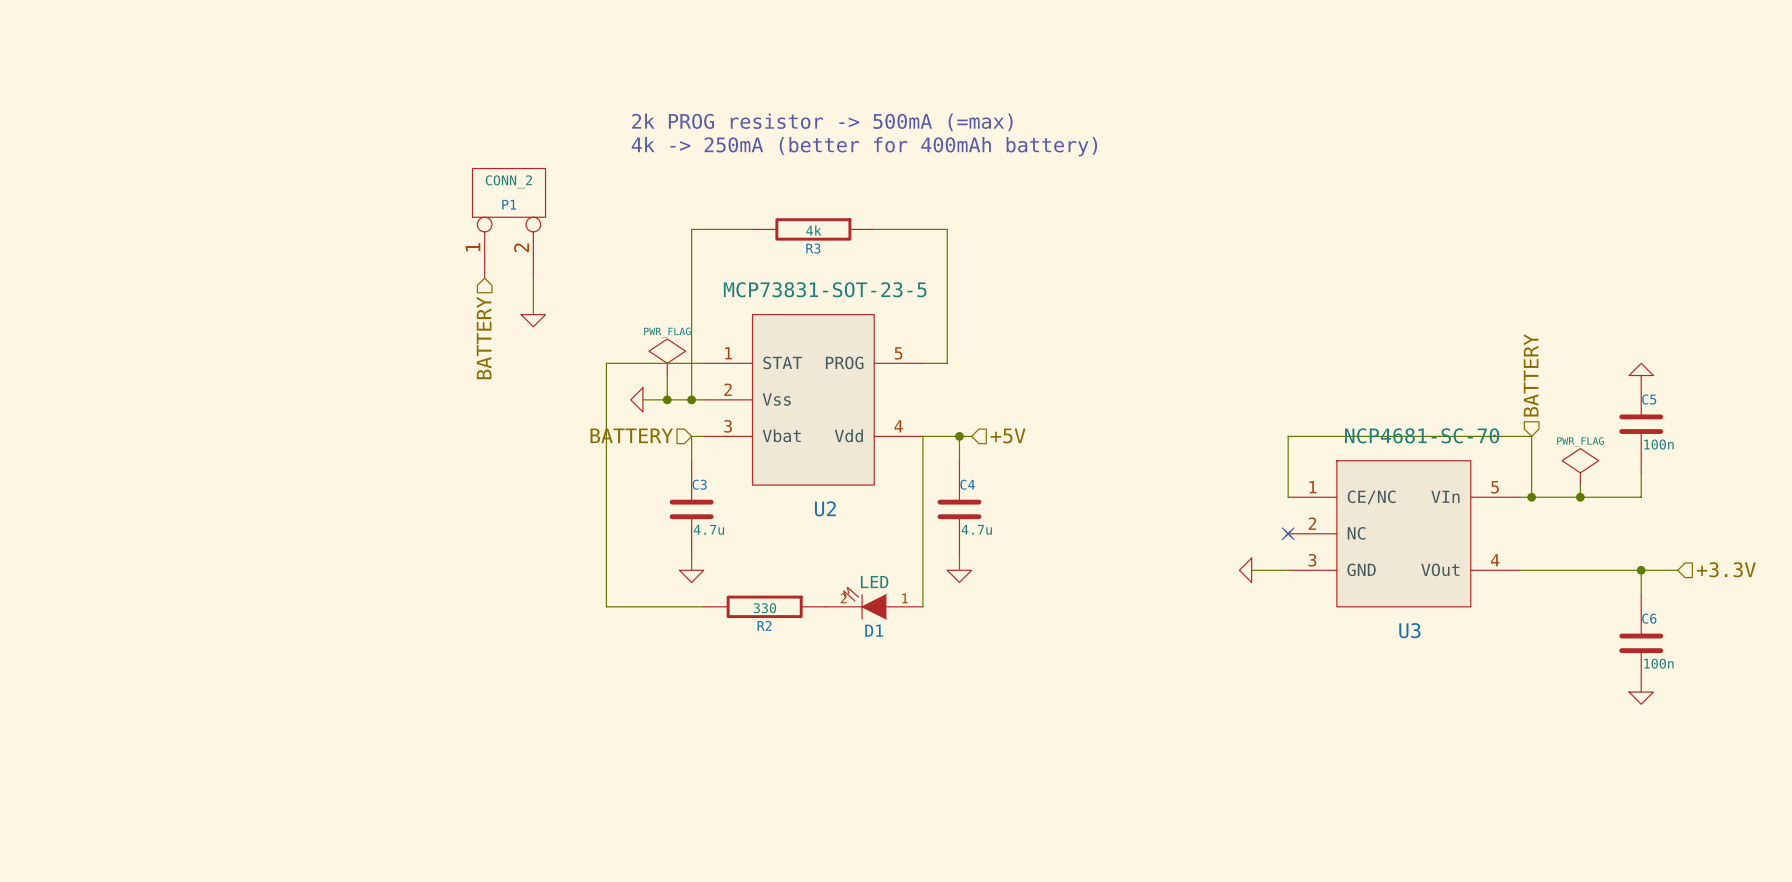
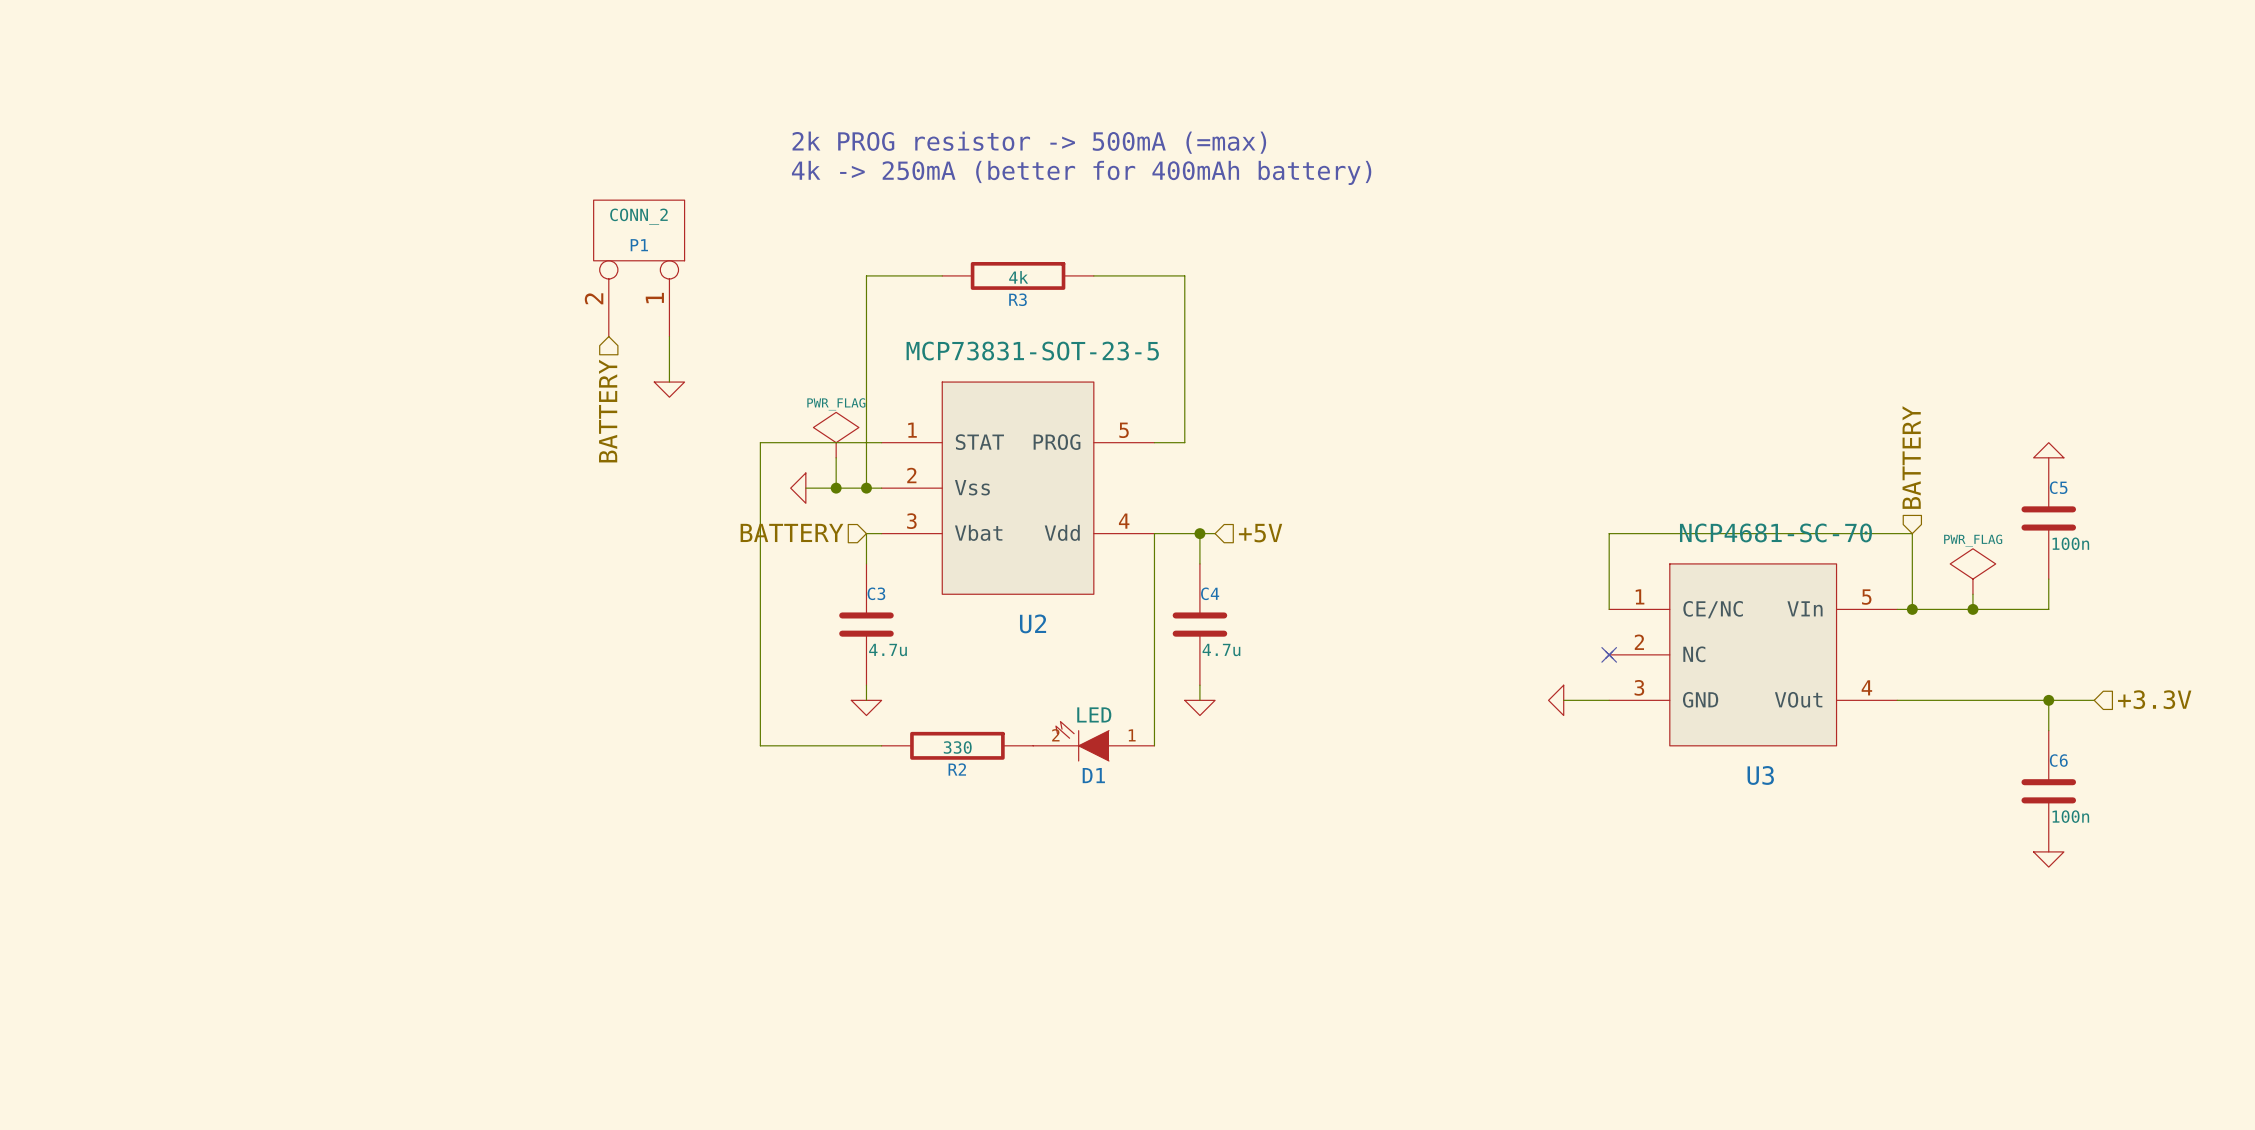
P1 flip: as is (509, 192) -> left-right (639, 230)

